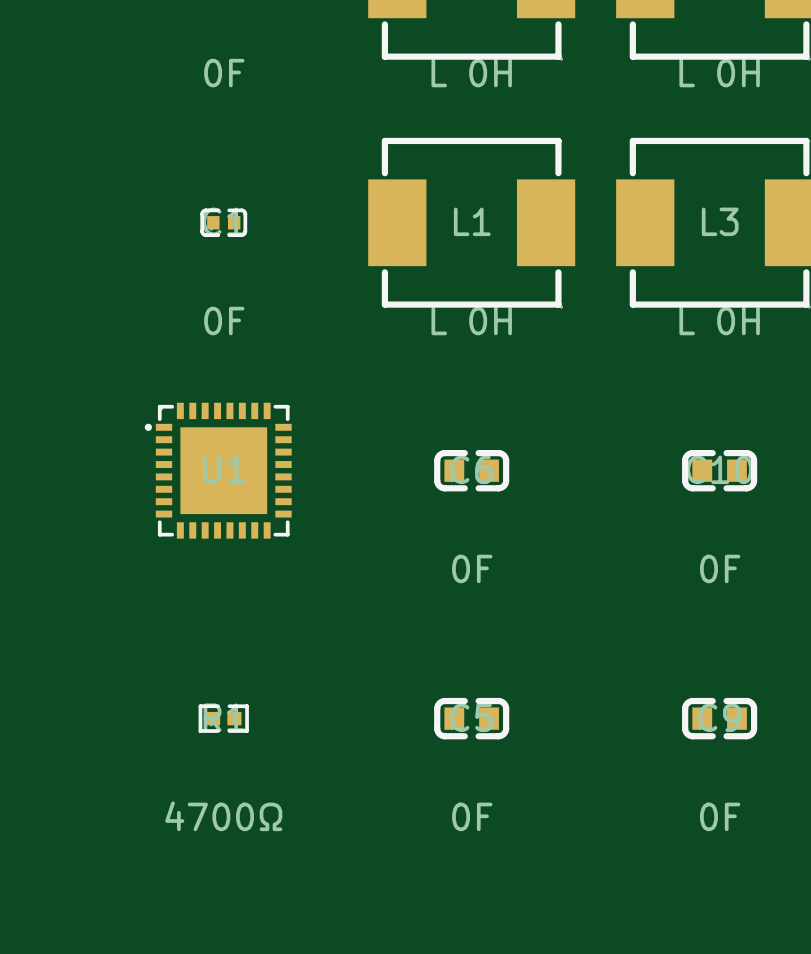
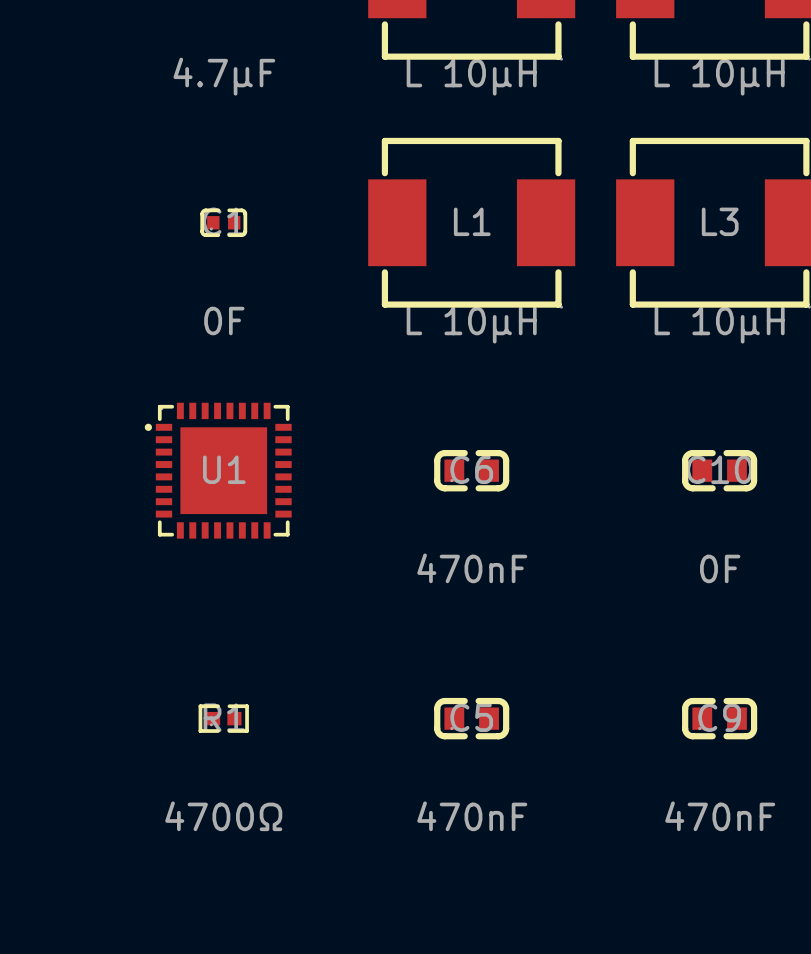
part value: 0F (224, 73) -> 4.7µF (224, 76)
part value: L 0H (471, 73) -> L 10µH (471, 77)
part value: L 0H (719, 73) -> L 10µH (719, 77)
L1 value: L 0H (471, 321) -> L 10µH (471, 325)
L3 value: L 0H (719, 321) -> L 10µH (719, 325)
C6 value: 0F (472, 568) -> 470nF (472, 568)
C5 value: 0F (472, 816) -> 470nF (472, 816)
C9 value: 0F (720, 816) -> 470nF (720, 816)

